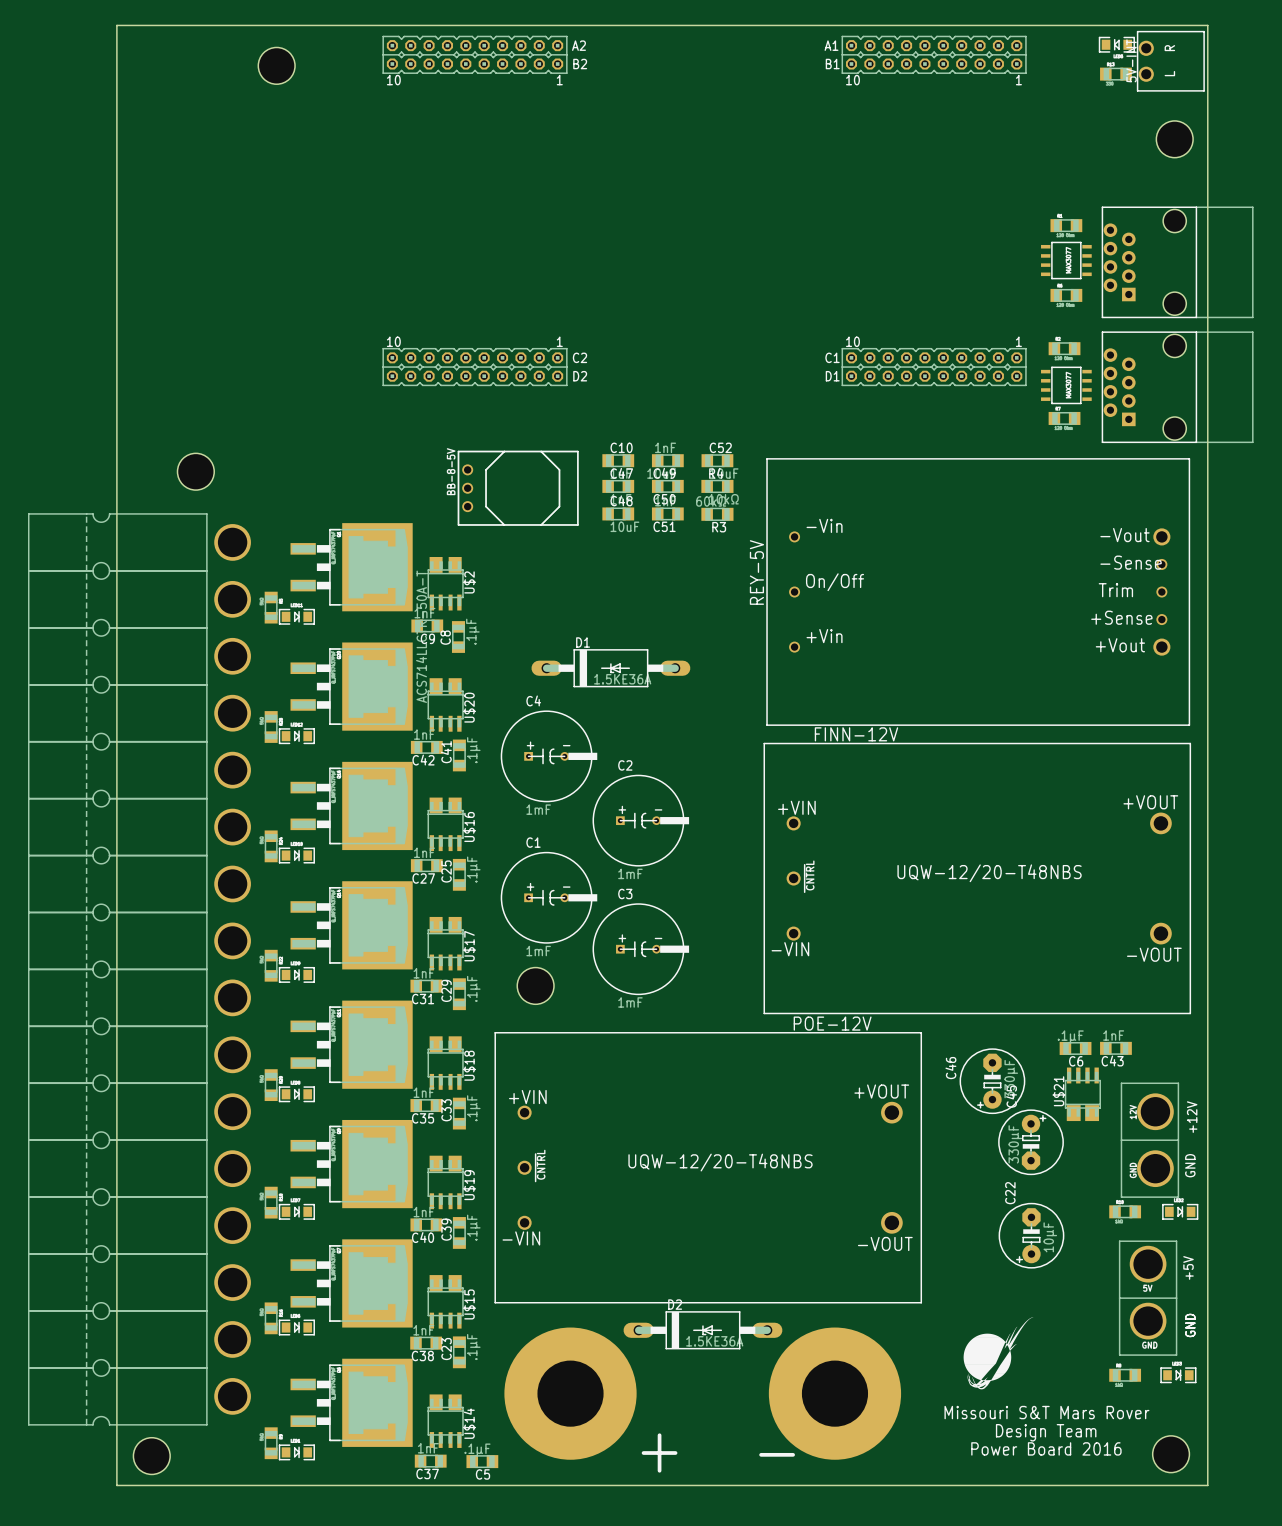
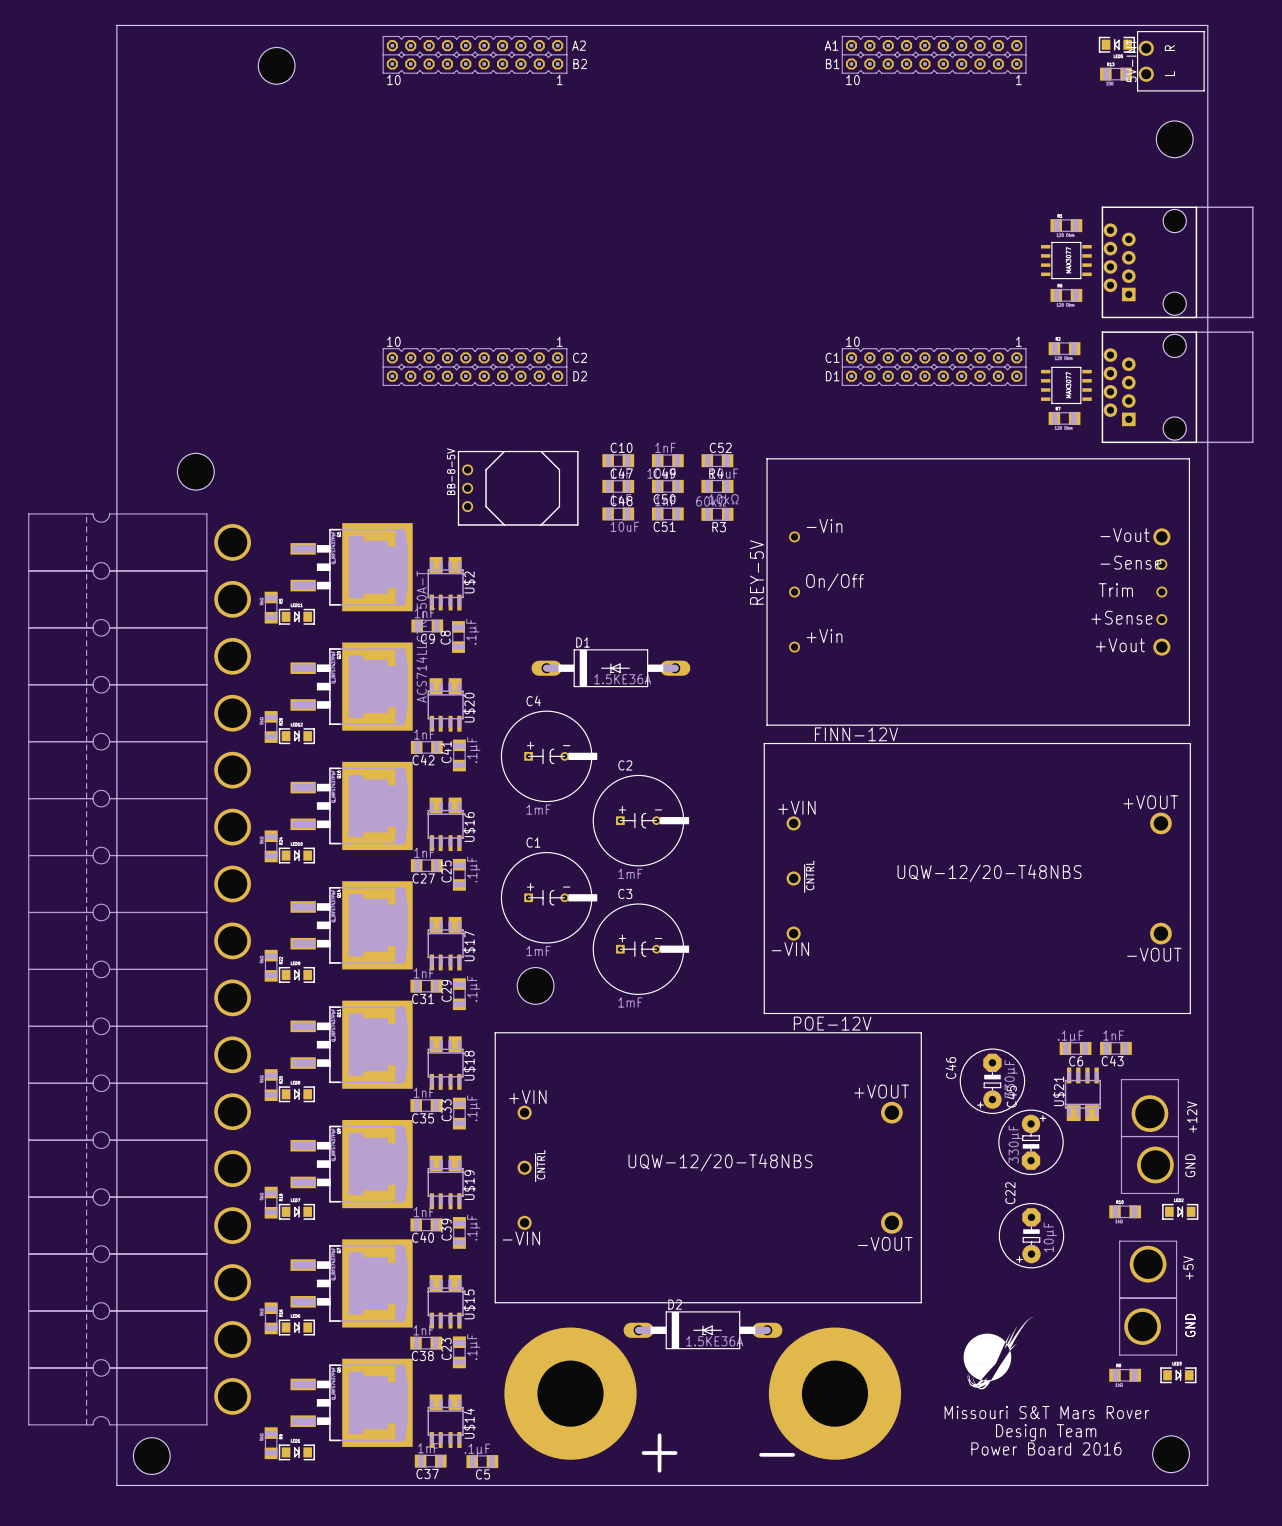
part: none -> (1149, 1108)
part: (1149, 1140) -> none
part: none -> (1149, 1165)
part: none -> (1148, 1269)
part: (1148, 1298) -> none
part: none -> (1148, 1326)

